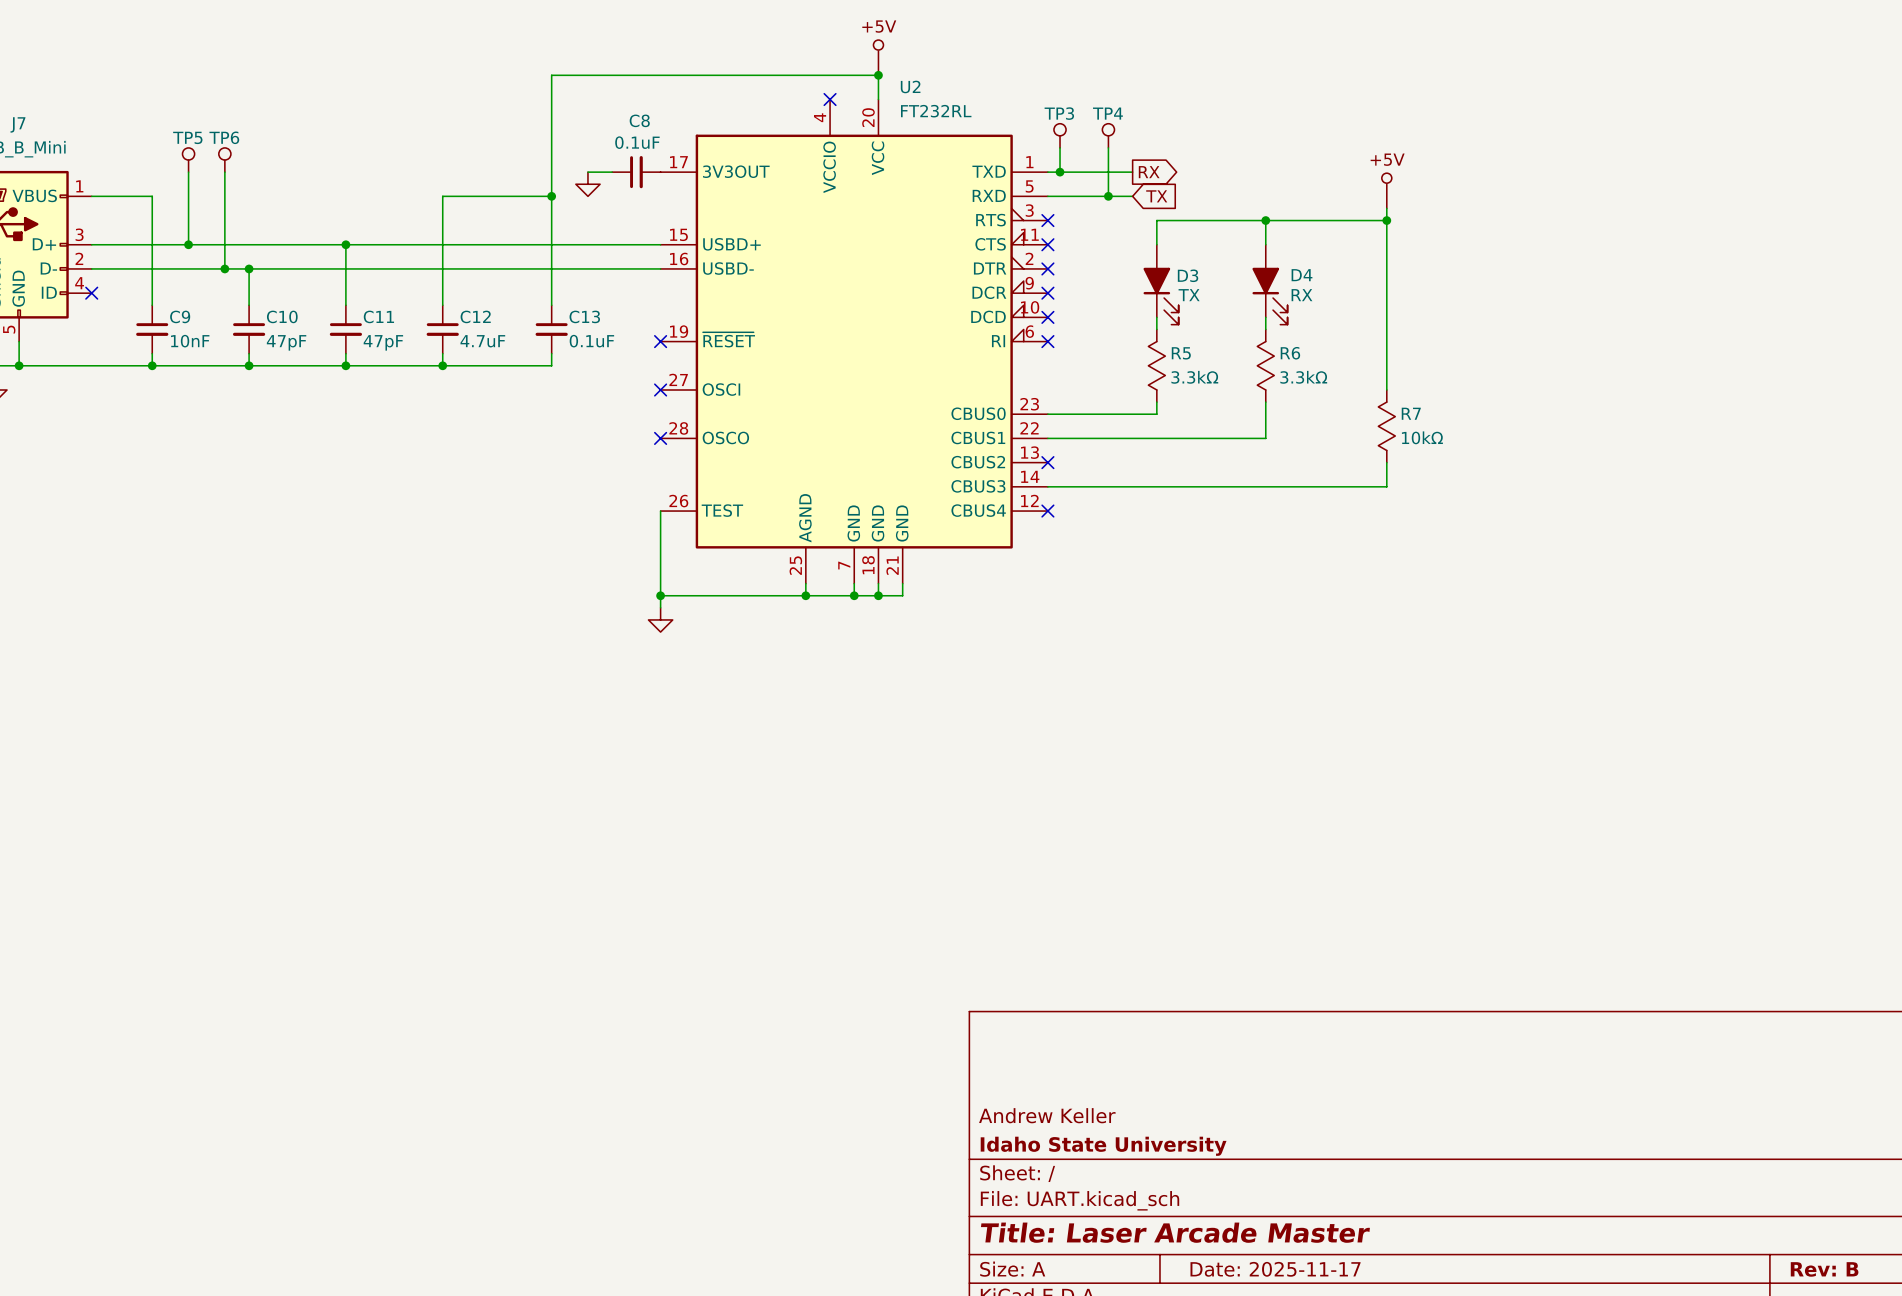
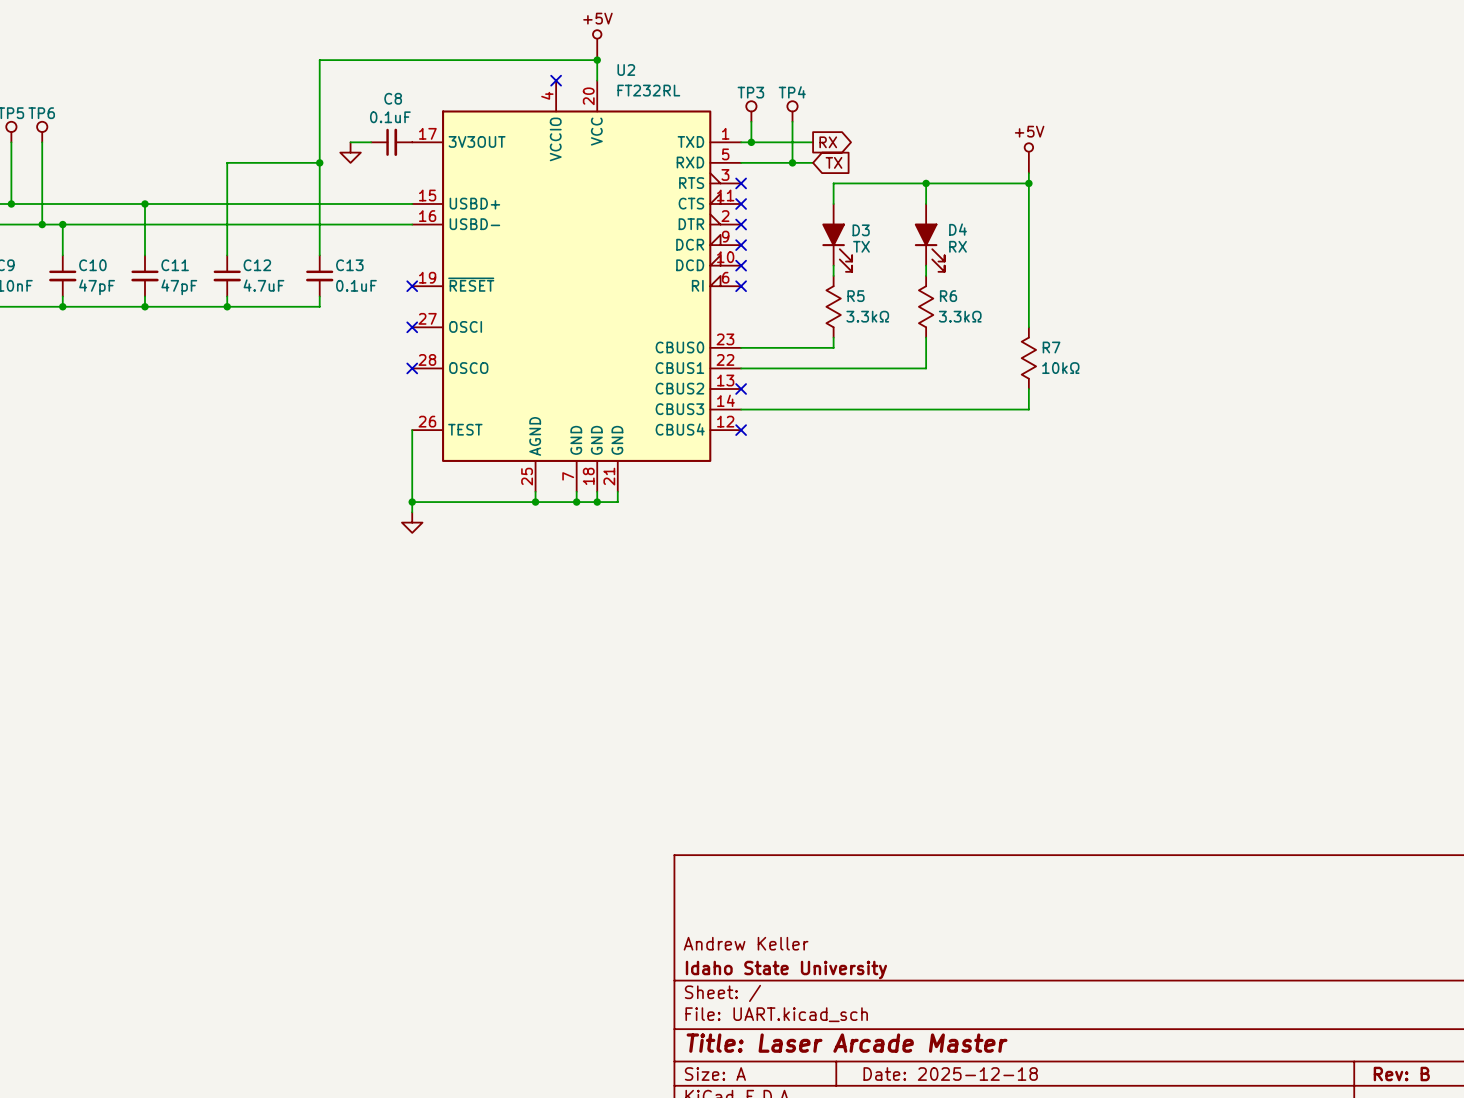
title block: Date: 2025-11-17 (1275, 1269) -> Date: 2025-12-18 (950, 1074)

